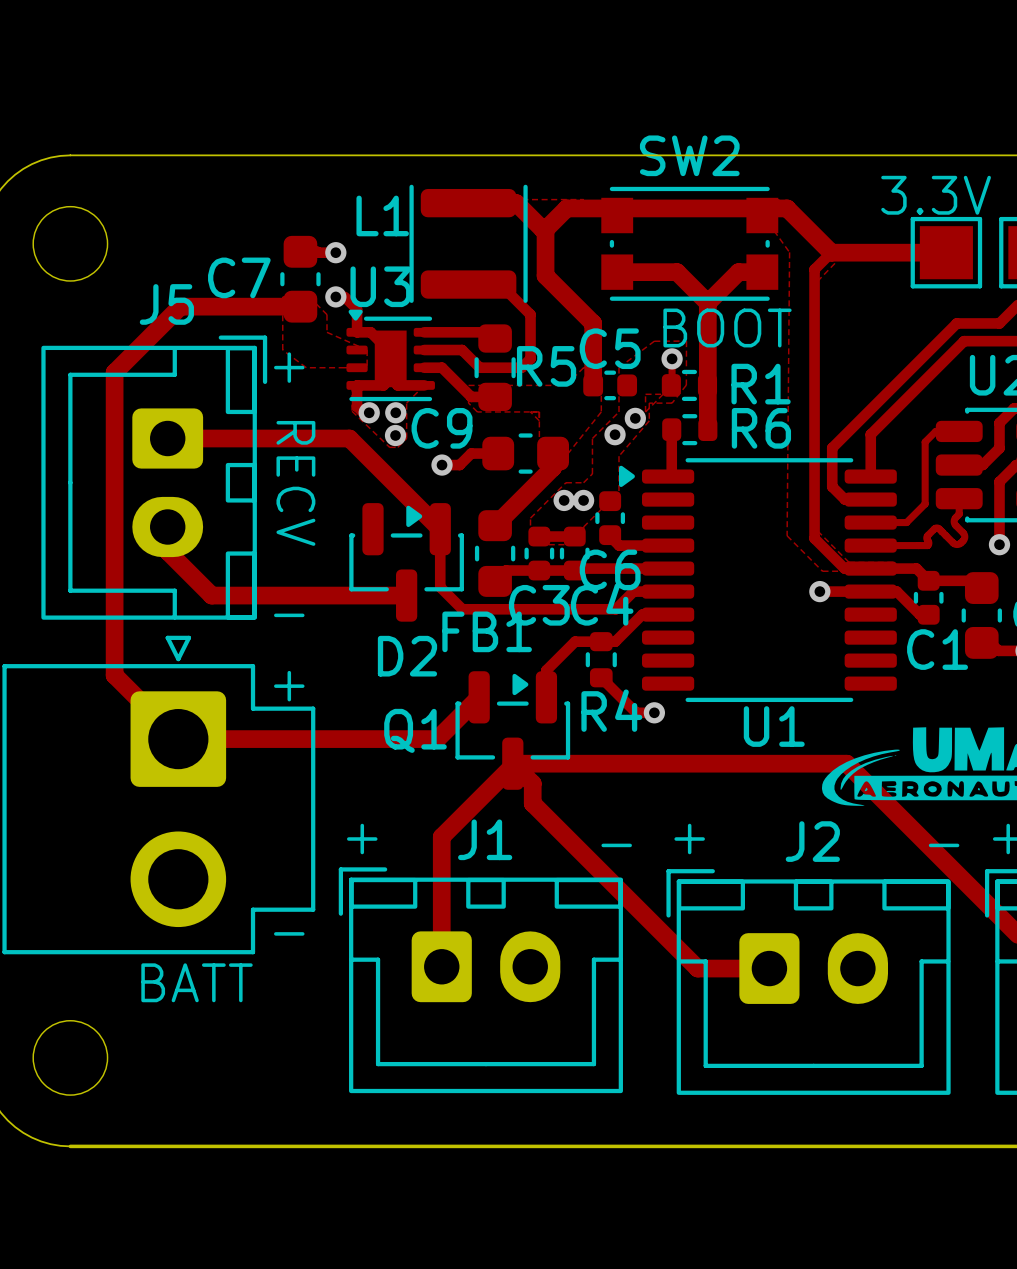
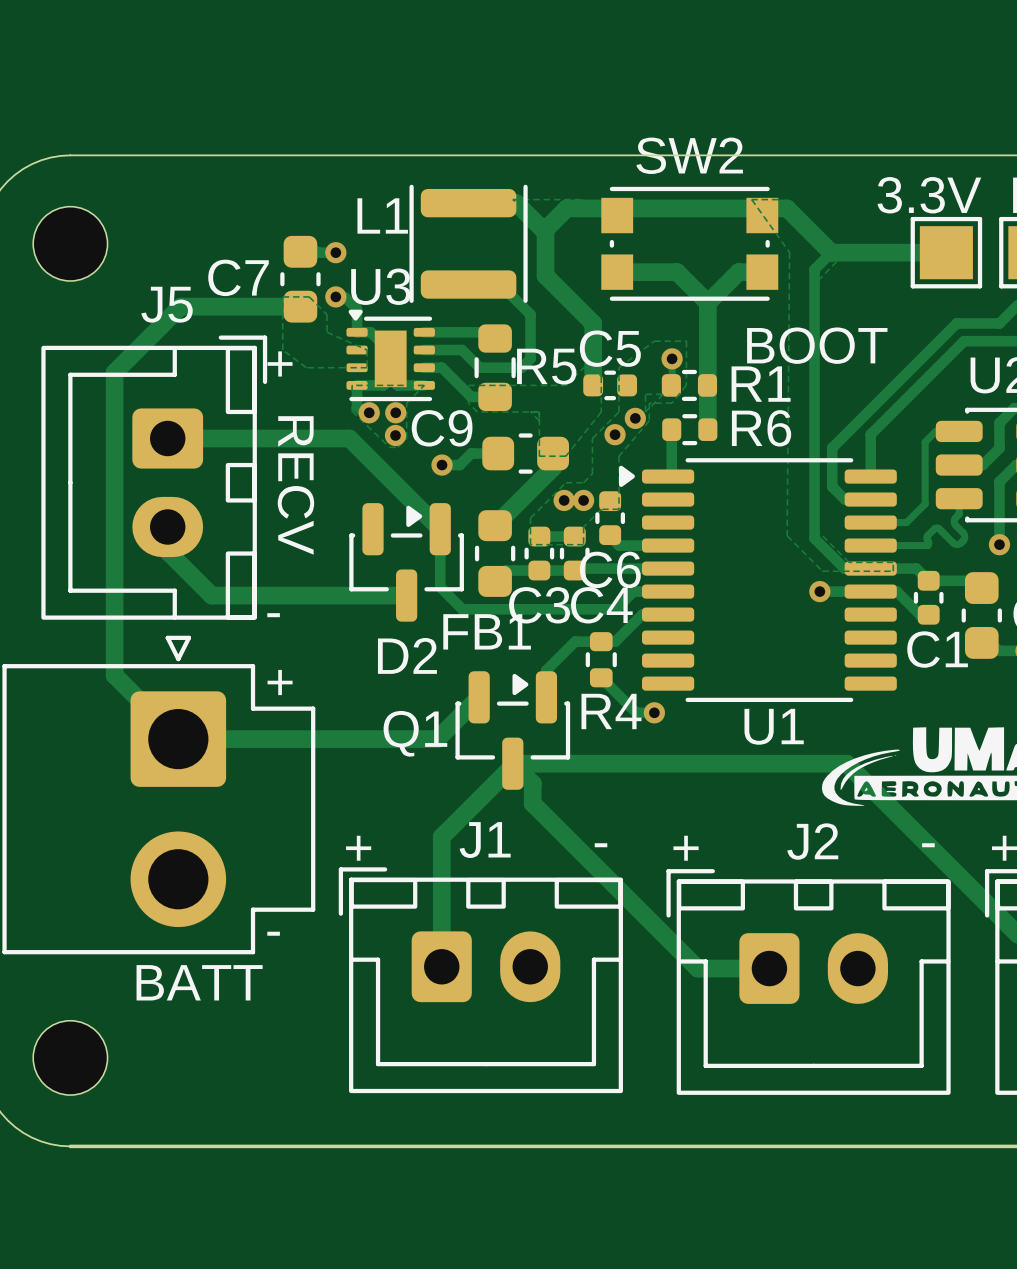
text position: BOOT (727, 327) -> BOOT (817, 345)

